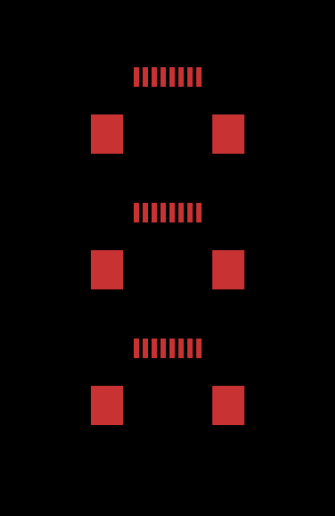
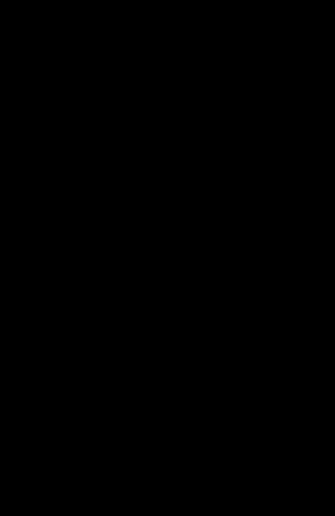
part: (167, 110) -> none
part: (167, 246) -> none
part: (167, 381) -> none

